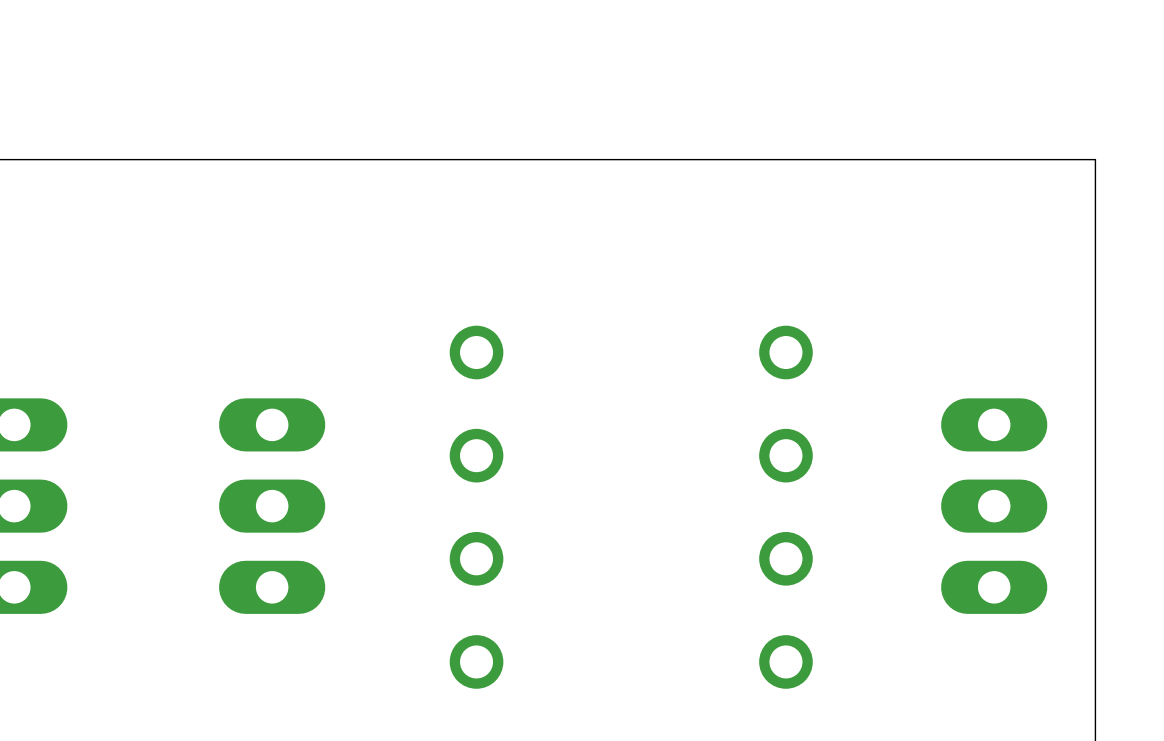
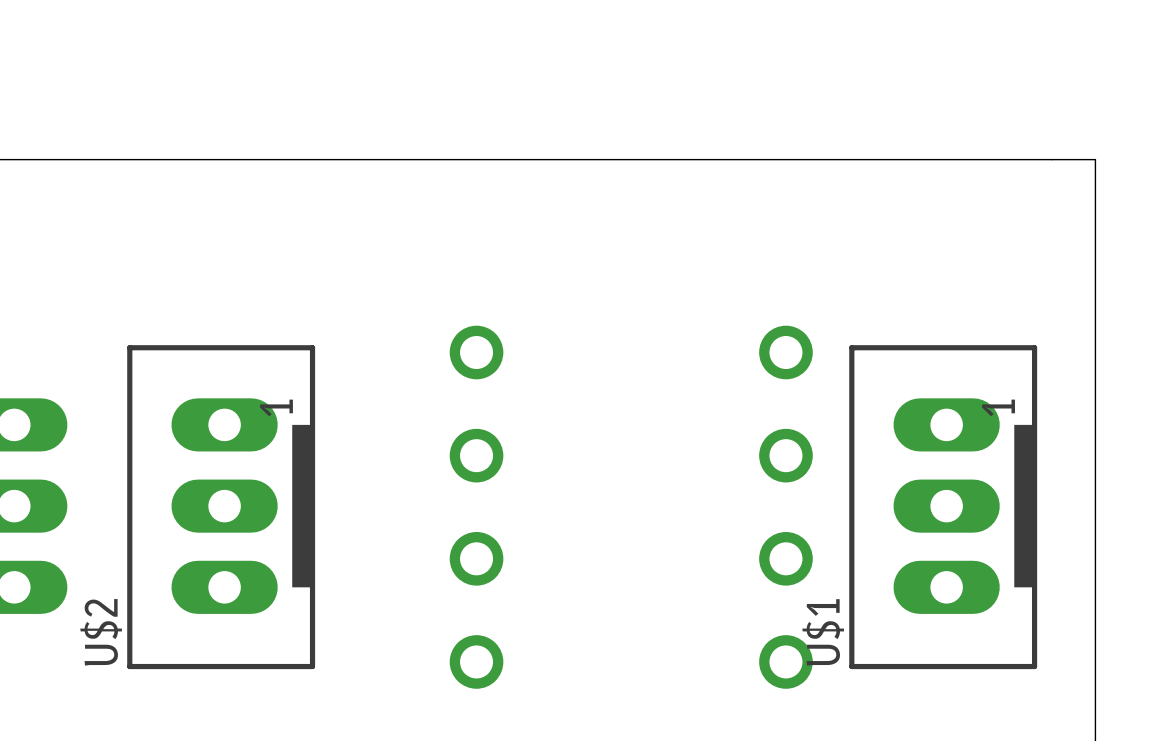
U$2 side: top (272, 506) -> bottom (221, 507)
U$1 side: top (994, 506) -> bottom (943, 507)

